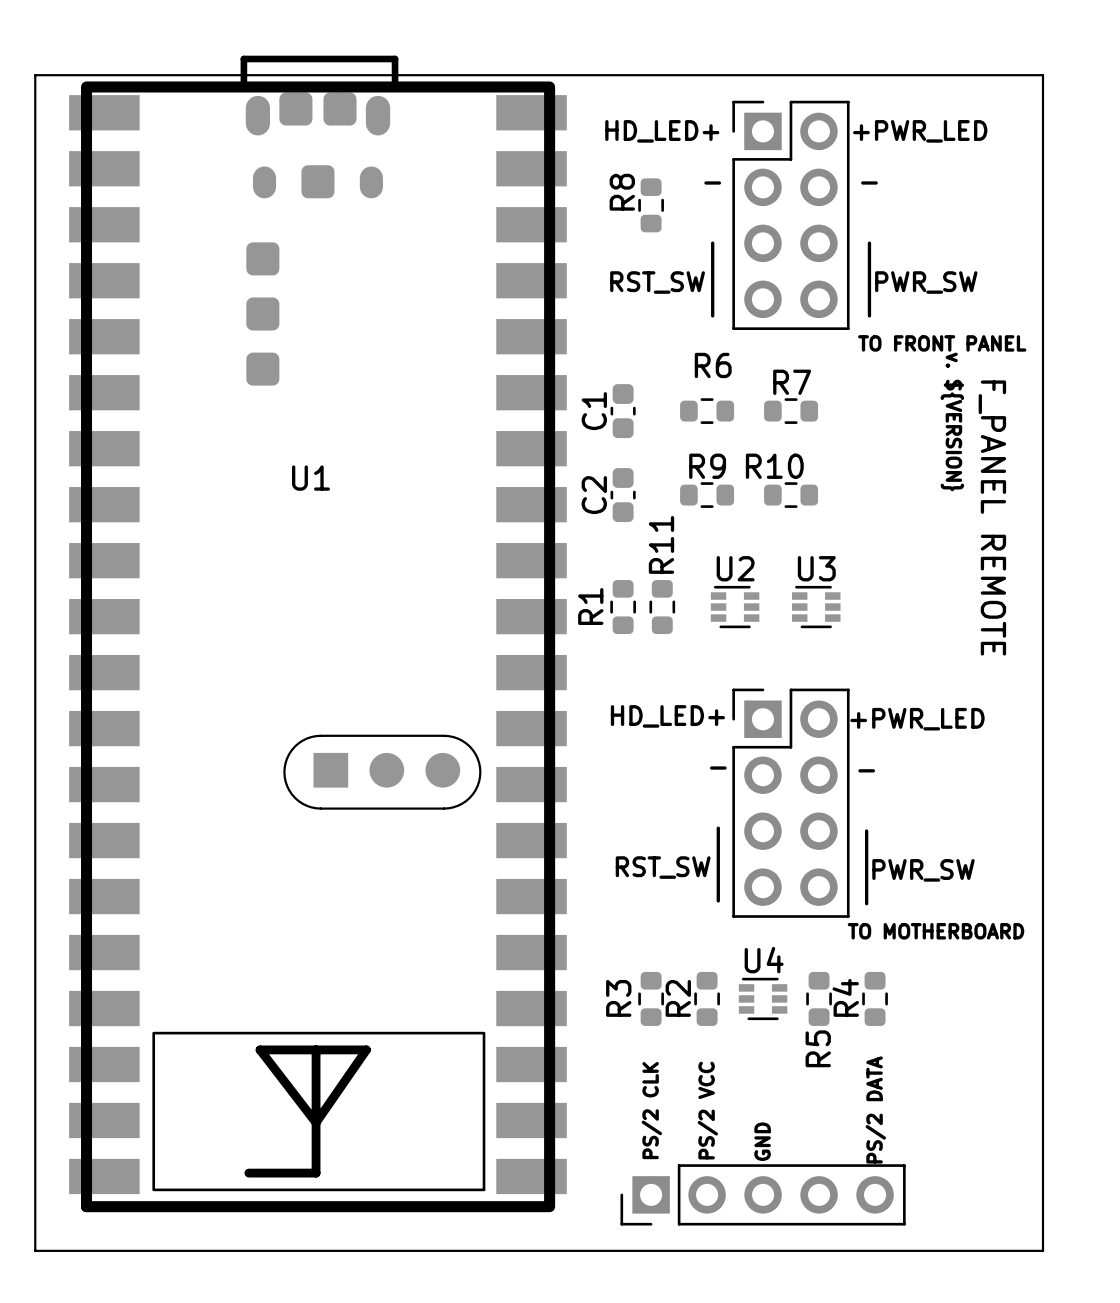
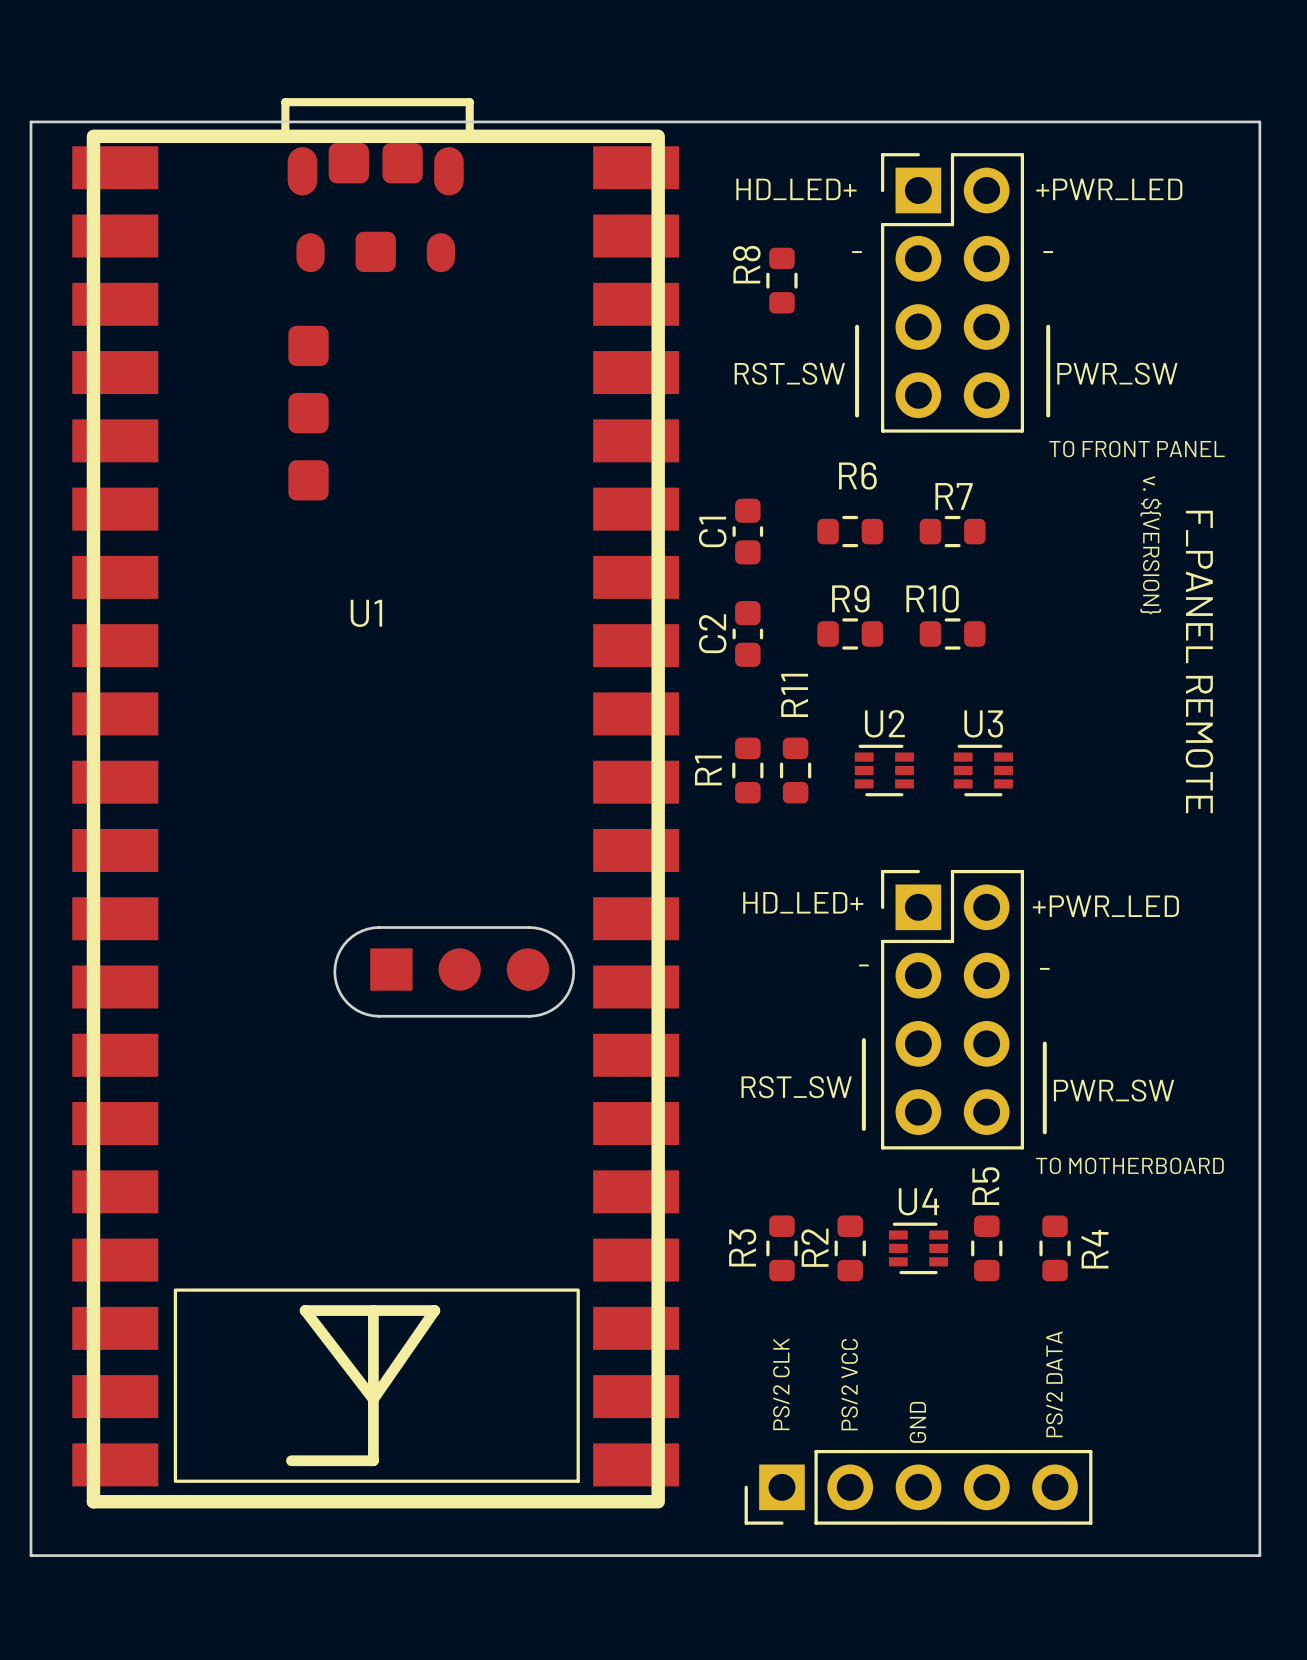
R4 name position: R4 (845, 997) -> R4 (1095, 1249)
R5 name position: R5 (818, 1048) -> R5 (985, 1186)

